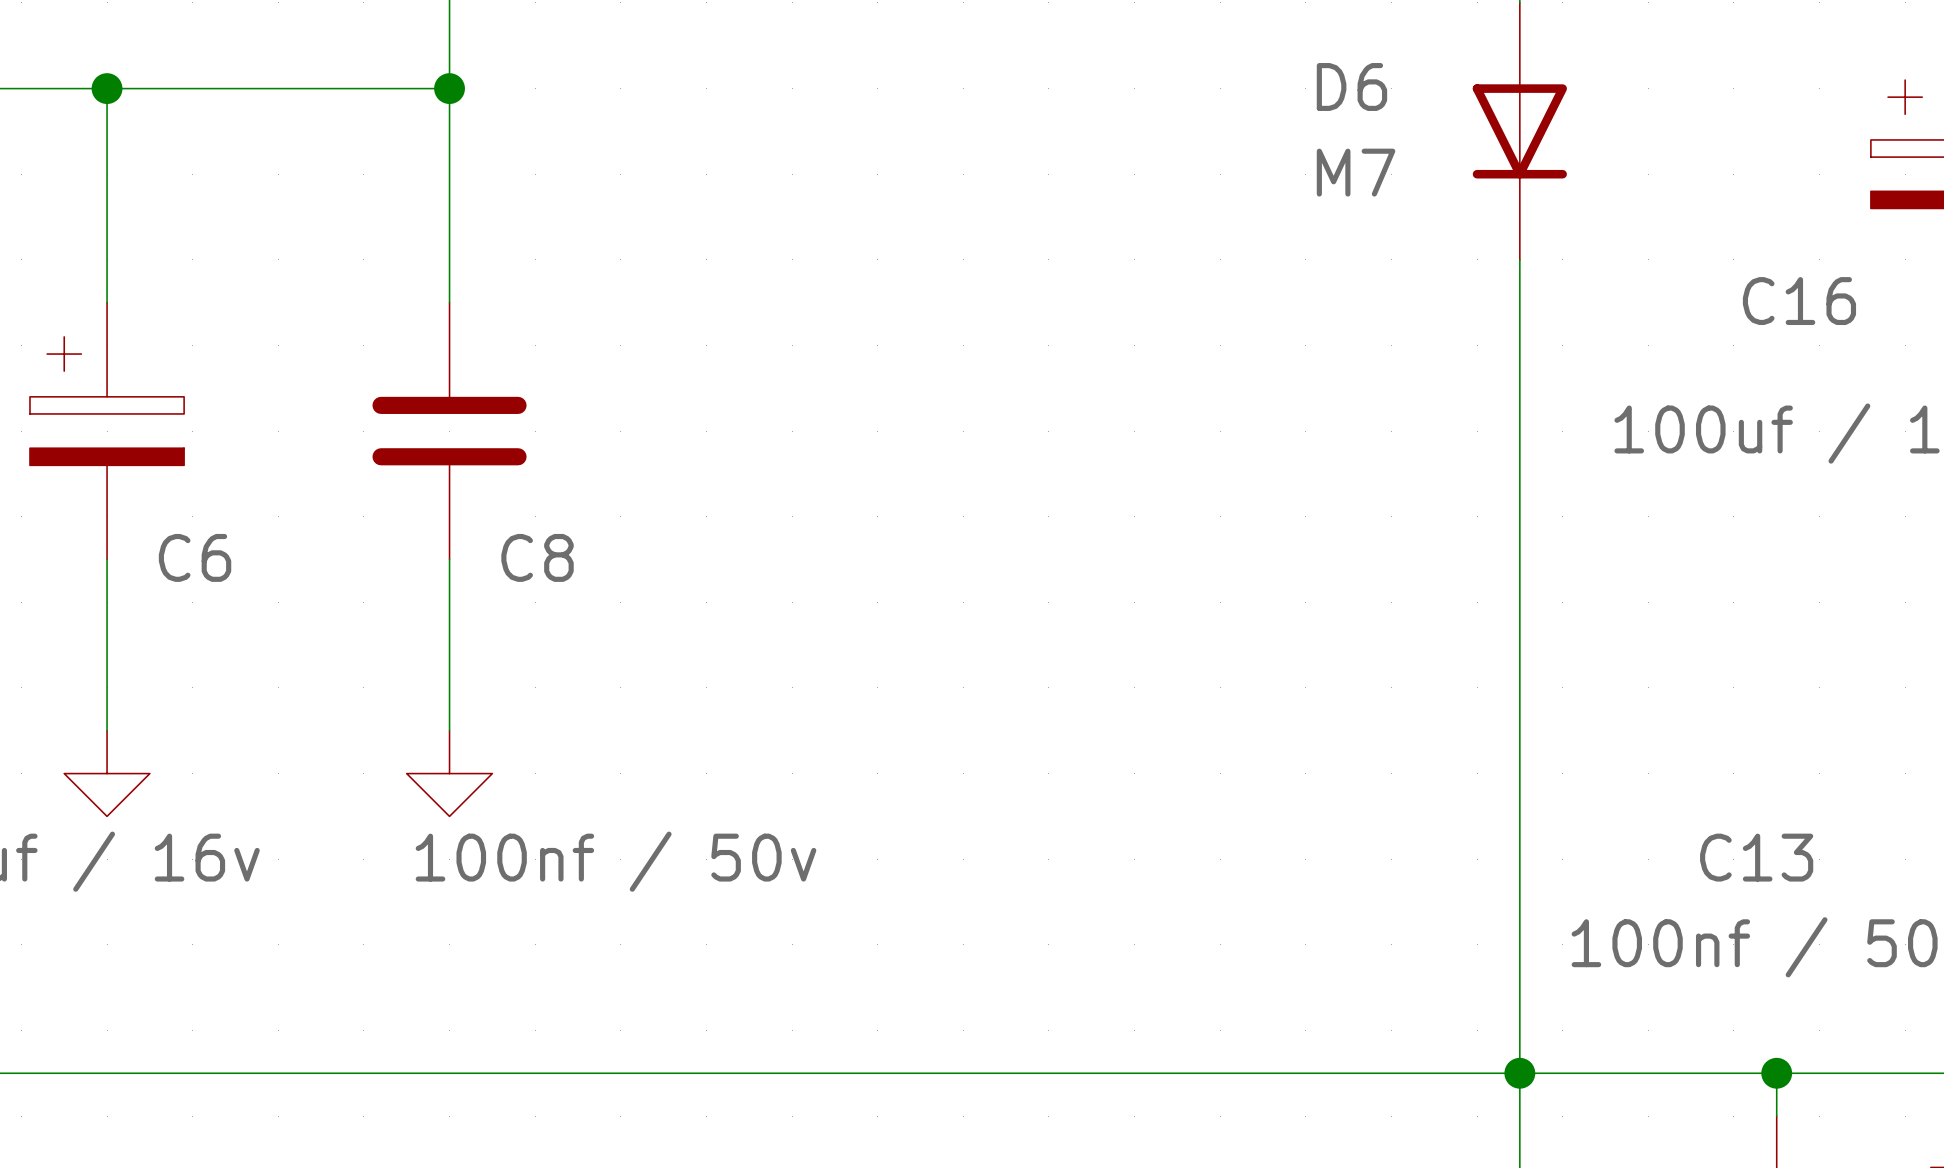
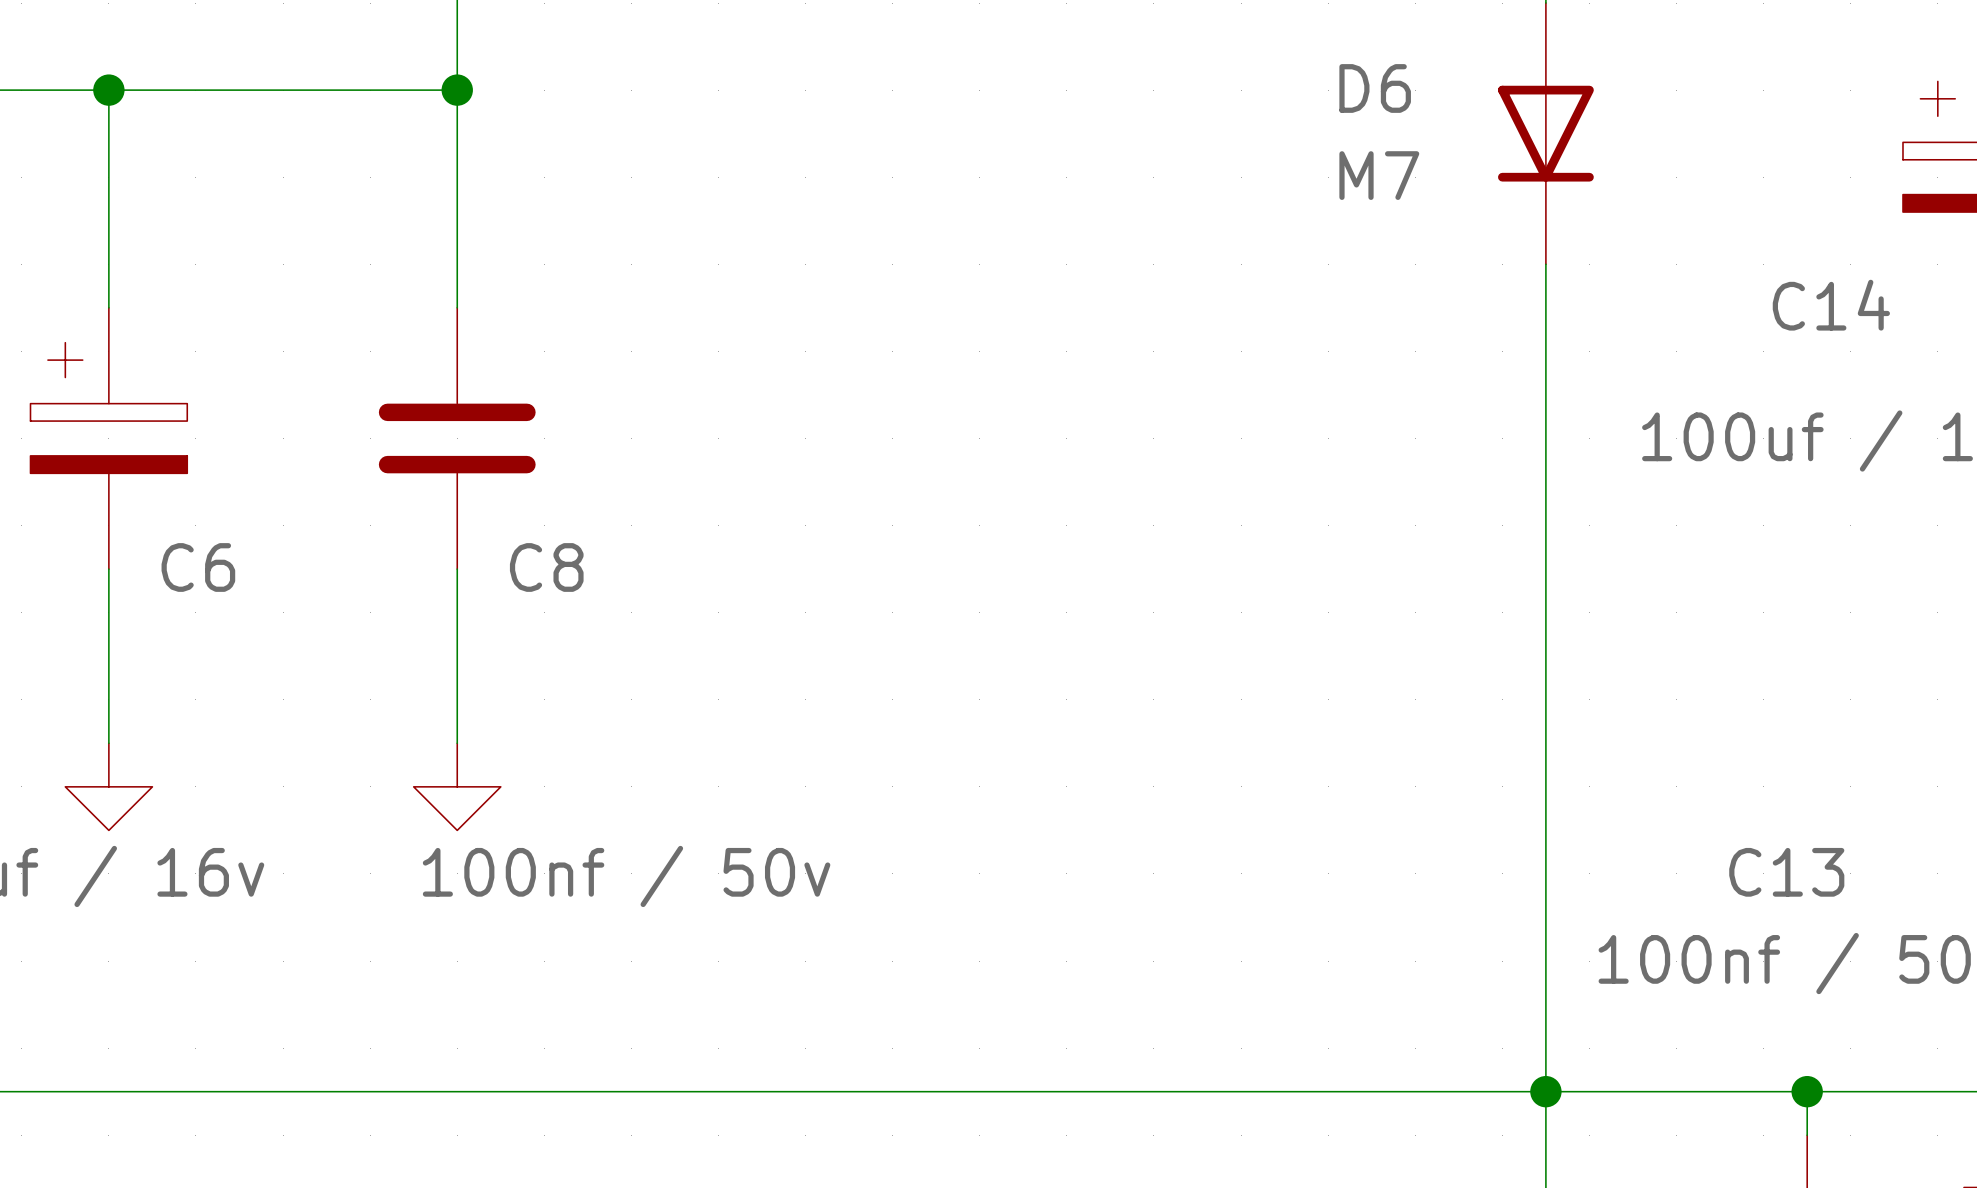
C16 name: C16 (1799, 301) -> C14 (1831, 305)

